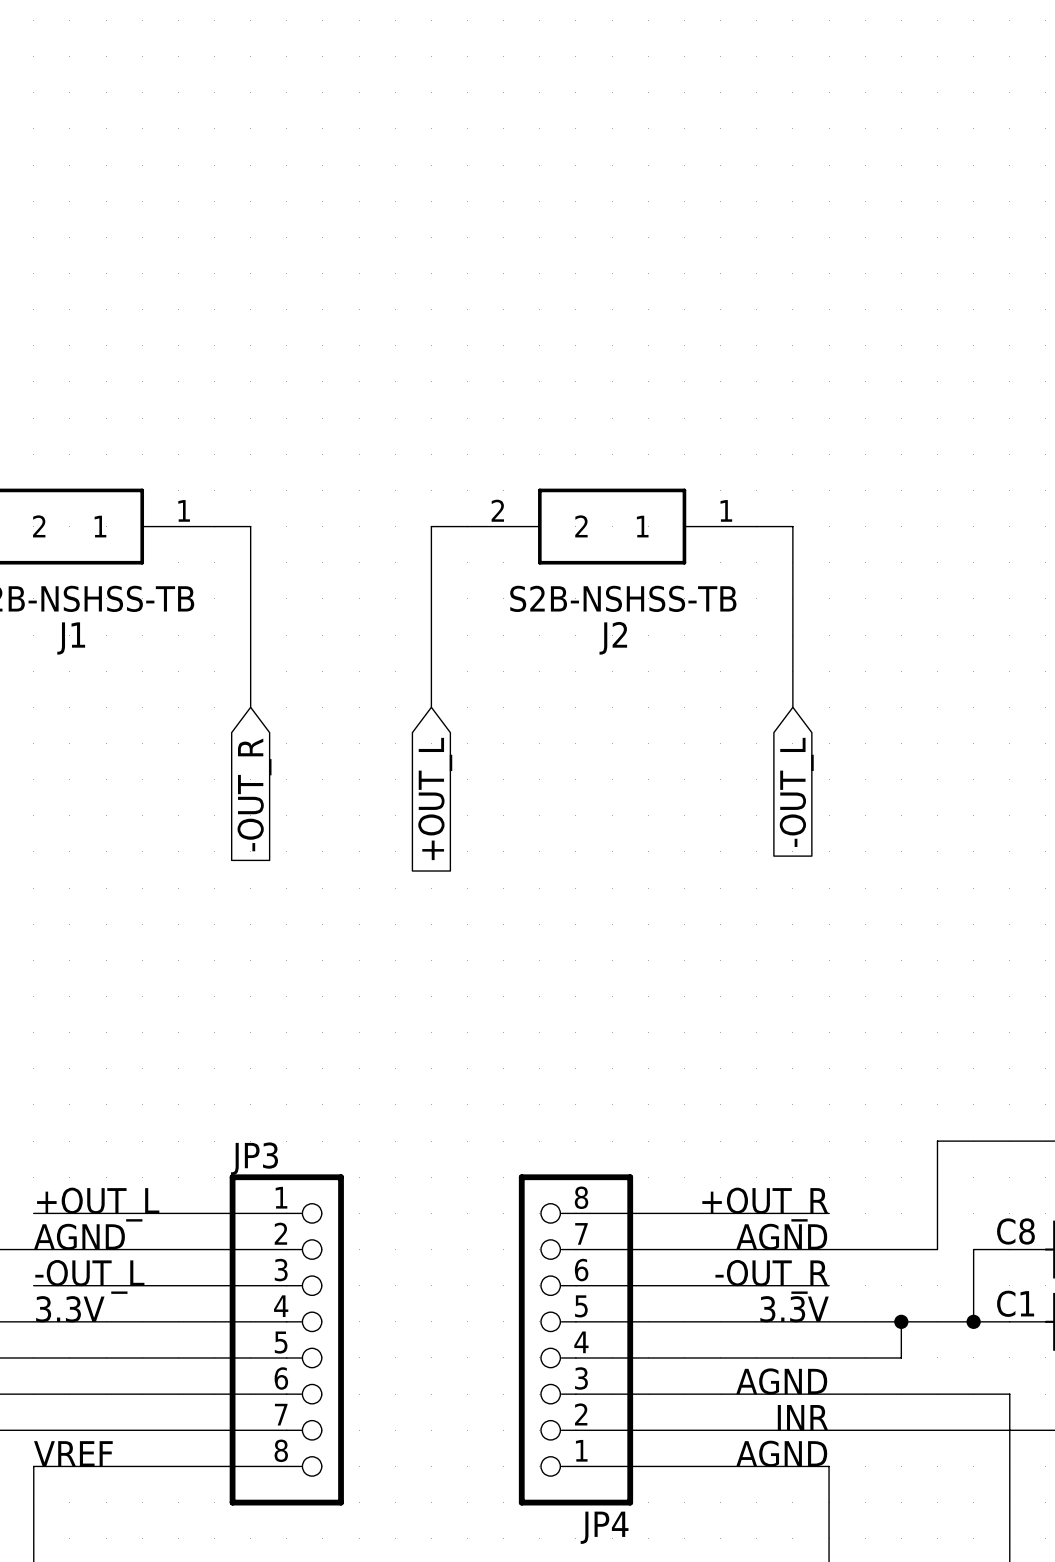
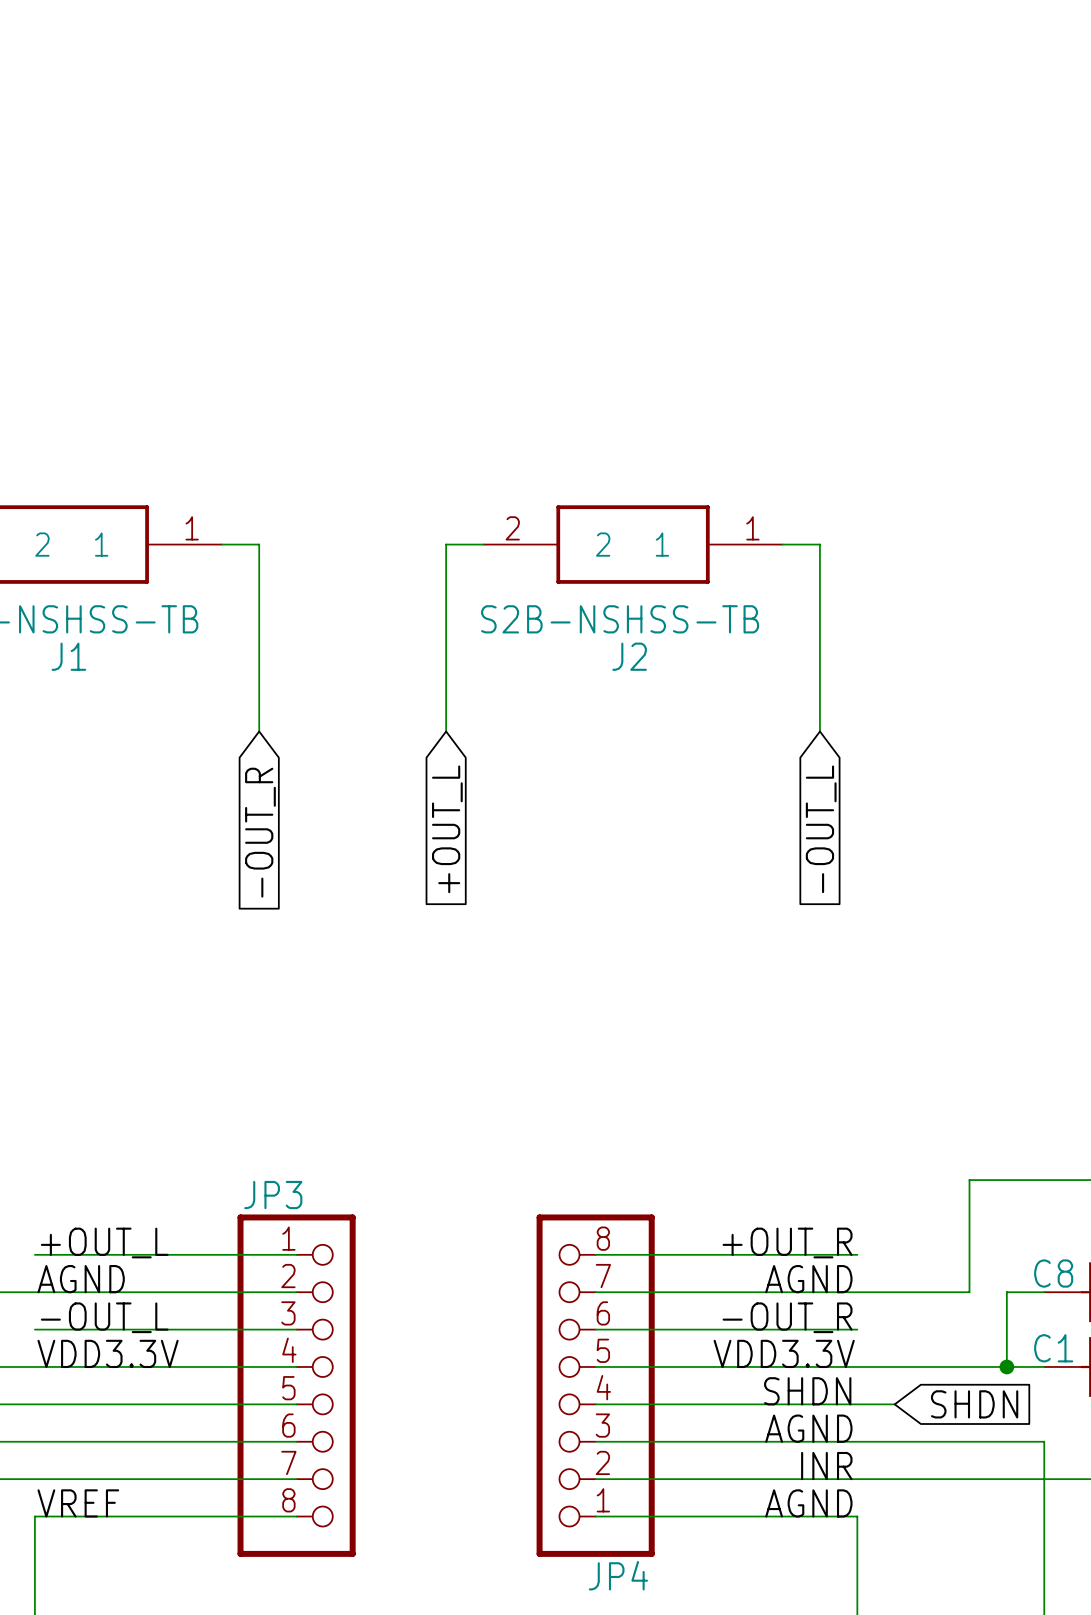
label: 3.3V (70, 1309) -> VDD3.3V (108, 1353)
label: 3.3V (794, 1309) -> VDD3.3V (784, 1353)
wire: (901, 1321) (901, 1357) (865, 1357) -> none
junction: (901, 1321) -> none
label: none -> SHDN (807, 1391)
global label: none -> SHDN (974, 1404)

